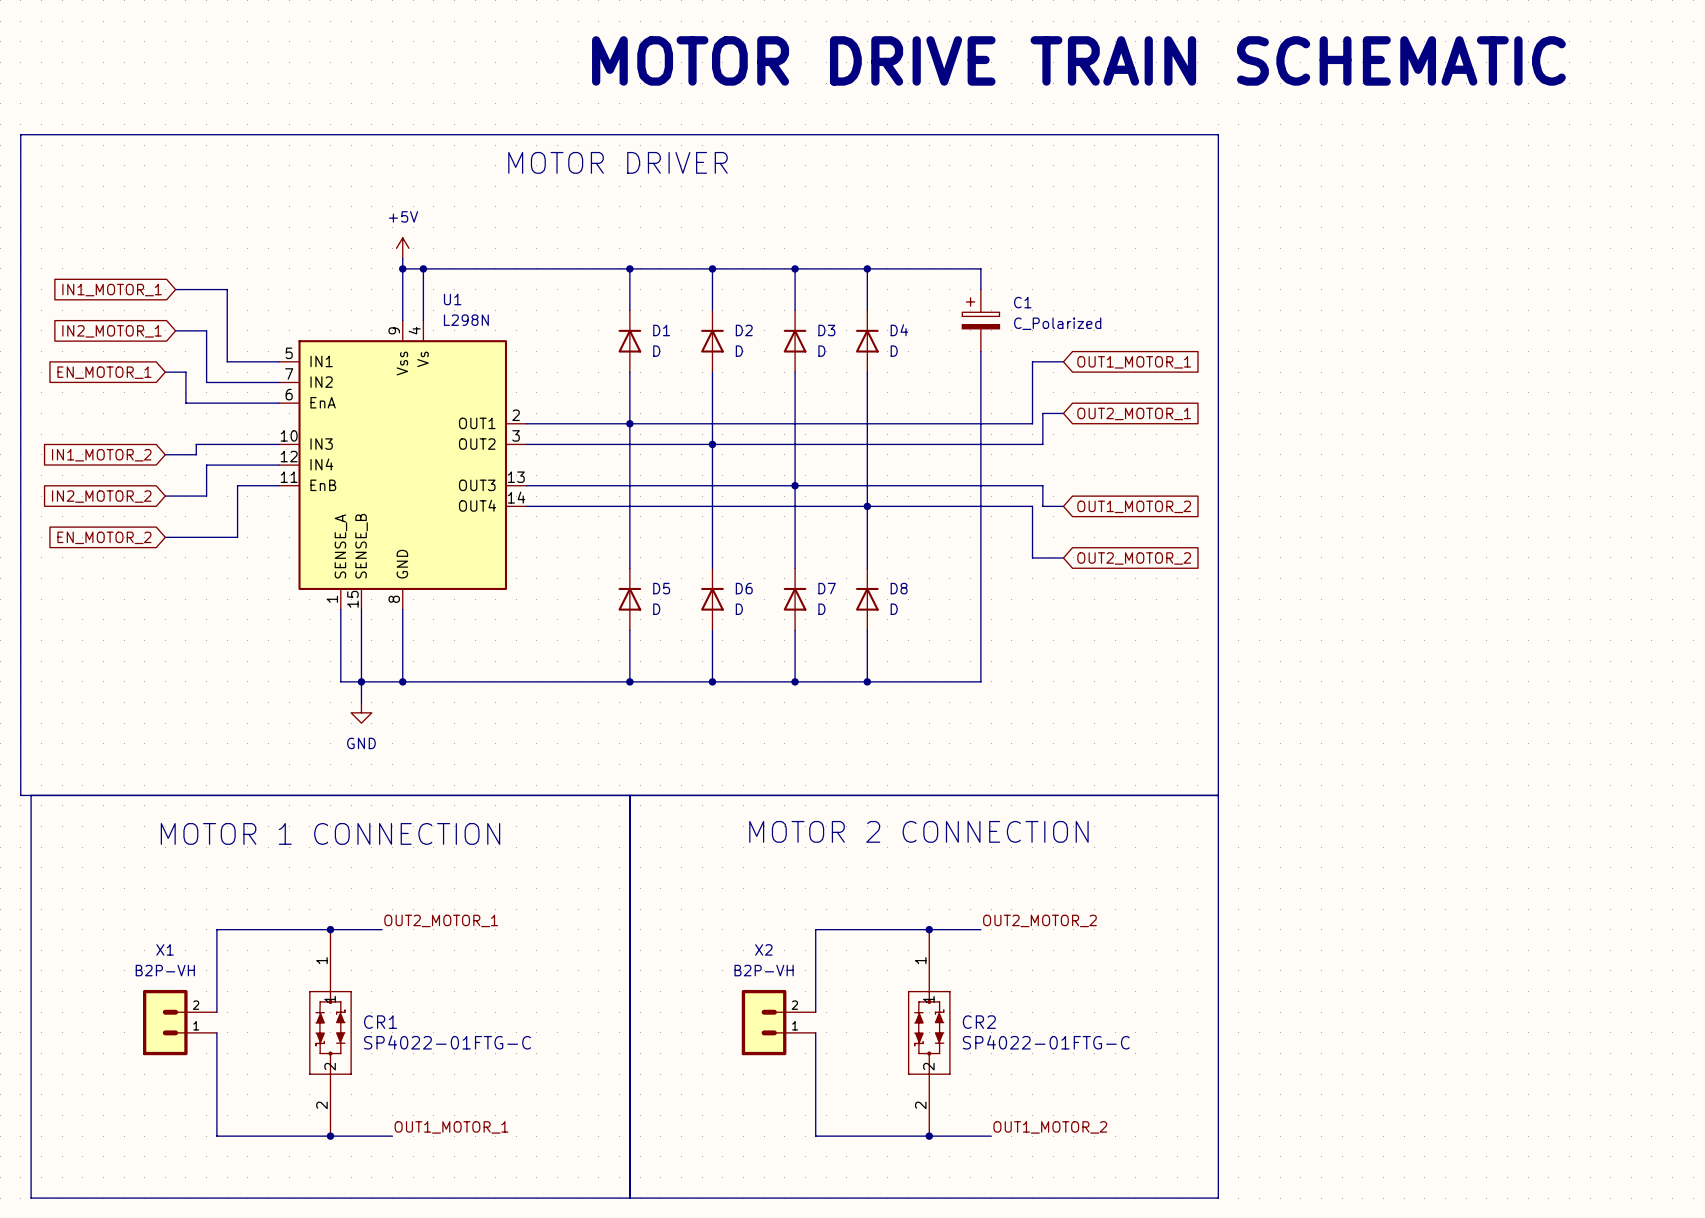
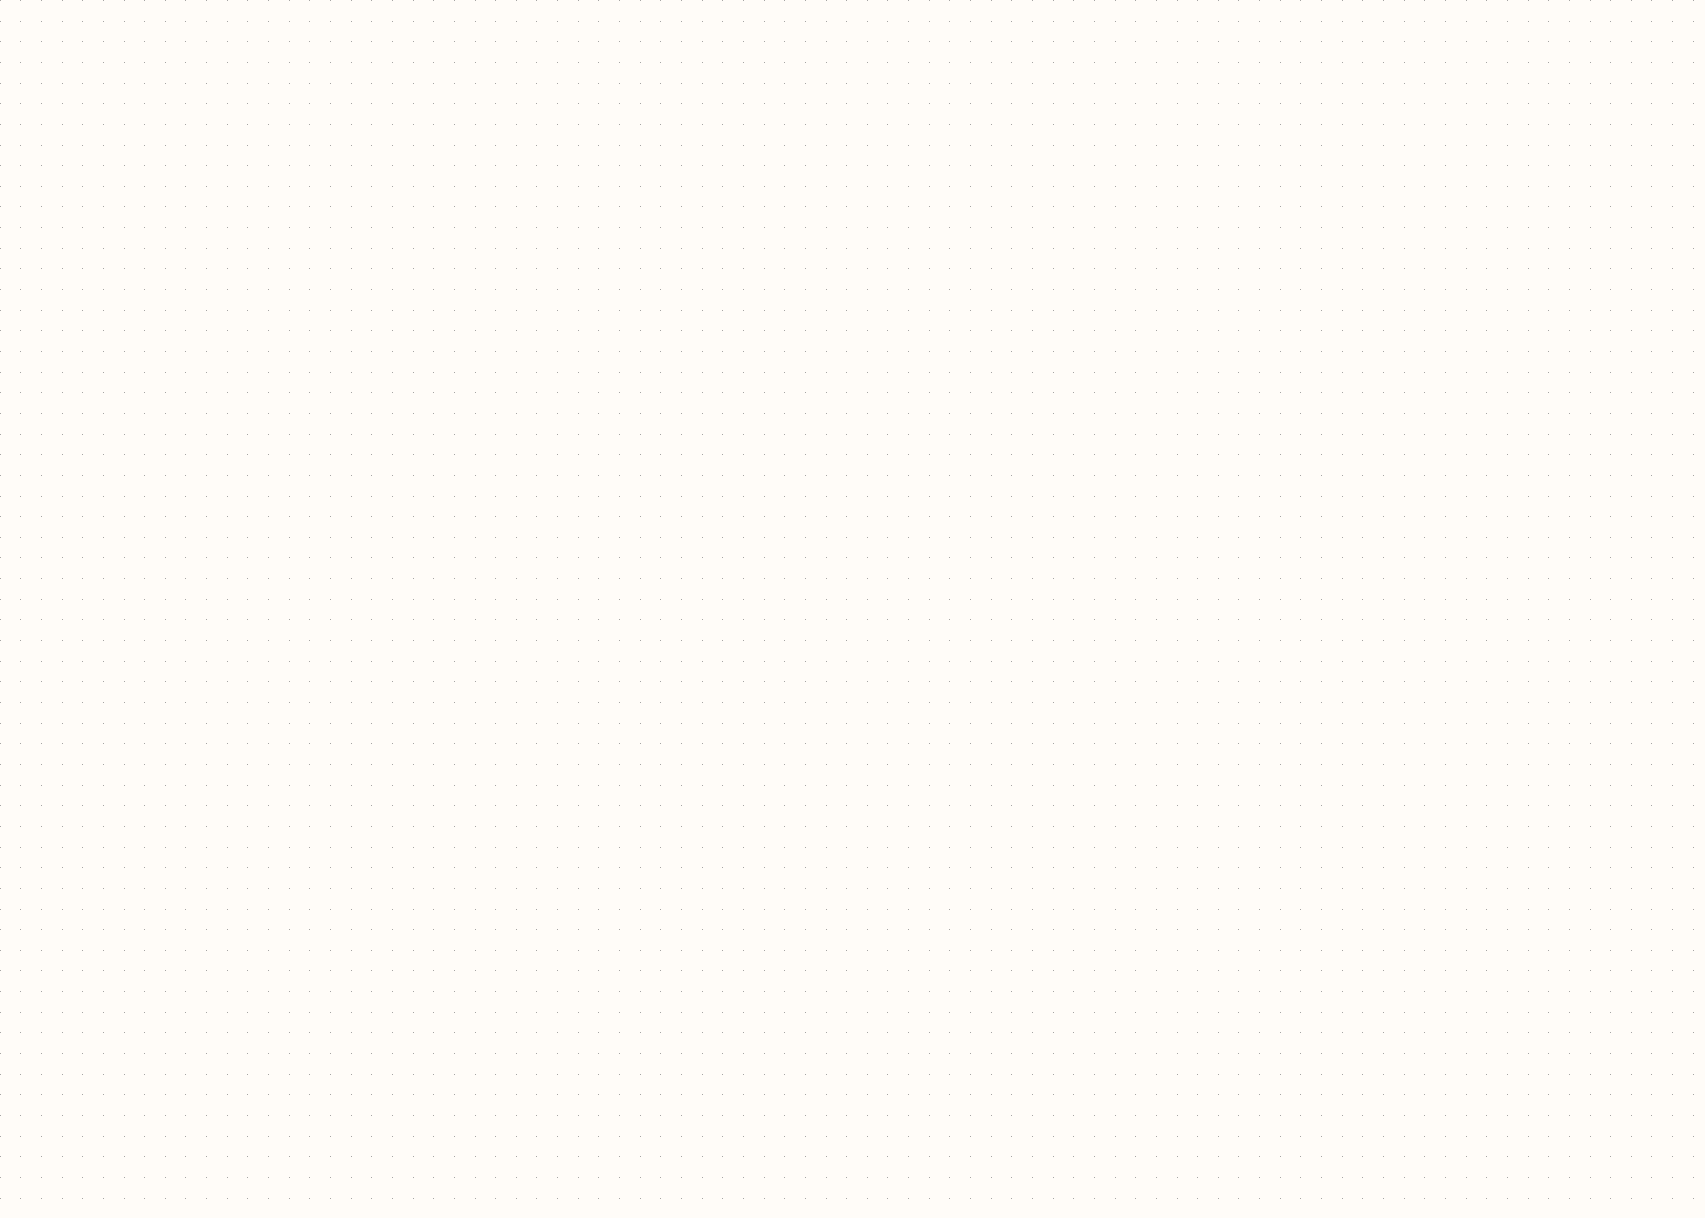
text: MOTOR DRIVE TRAIN SCHEMATIC (1078, 60) -> none
text: MOTOR DRIVER (617, 162) -> none
power symbol: +5V (402, 248) -> none
wire: (402, 258) (402, 320) -> none
wire: (402, 268) (980, 268) (980, 289) -> none
junction: (402, 268) -> none
wire: (423, 268) (423, 320) -> none
junction: (423, 268) -> none
wire: (629, 268) (629, 310) -> none
junction: (629, 268) -> none
wire: (712, 268) (712, 310) -> none
junction: (712, 268) -> none
wire: (795, 268) (795, 310) -> none
junction: (795, 268) -> none
wire: (867, 268) (867, 310) -> none
junction: (867, 268) -> none
wire: (175, 289) (227, 289) (227, 361) (278, 361) -> none
global label: IN1_MOTOR_1 (112, 290) -> none
C1: C_Polarized (980, 320) -> none
wire: (175, 330) (206, 330) (206, 382) (278, 382) -> none
global label: IN2_MOTOR_1 (112, 331) -> none
D1: D (629, 341) -> none
D2: D (712, 341) -> none
D3: D (795, 341) -> none
D4: D (867, 341) -> none
wire: (980, 351) (980, 681) (340, 681) (340, 609) -> none
wire: (1063, 361) (1032, 361) (1032, 423) (526, 423) -> none
global label: OUT1_MOTOR_1 (1134, 362) -> none
global label: EN_MOTOR_1 (104, 372) -> none
wire: (165, 372) (185, 372) (185, 403) (278, 403) -> none
wire: (629, 372) (629, 568) -> none
wire: (712, 372) (712, 568) -> none
wire: (795, 372) (795, 568) -> none
wire: (867, 372) (867, 568) -> none
wire: (1063, 413) (1042, 413) (1042, 444) (526, 444) -> none
global label: OUT2_MOTOR_1 (1134, 413) -> none
junction: (629, 423) -> none
wire: (278, 444) (196, 444) (196, 454) (165, 454) -> none
junction: (712, 444) -> none
global label: IN1_MOTOR_2 (101, 455) -> none
wire: (278, 465) (206, 465) (206, 496) (165, 496) -> none
U1: L298N (402, 465) -> none
wire: (278, 485) (237, 485) (237, 537) (165, 537) -> none
wire: (526, 485) (1042, 485) (1042, 506) (1063, 506) -> none
junction: (795, 485) -> none
global label: IN2_MOTOR_2 (101, 496) -> none
wire: (526, 506) (1032, 506) (1032, 557) (1063, 557) -> none
junction: (867, 506) -> none
global label: OUT1_MOTOR_2 (1134, 506) -> none
global label: EN_MOTOR_2 (104, 537) -> none
global label: OUT2_MOTOR_2 (1134, 558) -> none
D5: D (629, 599) -> none
D6: D (712, 599) -> none
D7: D (795, 599) -> none
D8: D (867, 599) -> none
wire: (361, 609) (361, 702) -> none
wire: (402, 609) (402, 681) -> none
wire: (629, 630) (629, 681) -> none
wire: (712, 630) (712, 681) -> none
wire: (795, 630) (795, 681) -> none
wire: (867, 630) (867, 681) -> none
junction: (361, 681) -> none
junction: (402, 681) -> none
junction: (629, 681) -> none
junction: (712, 681) -> none
junction: (795, 681) -> none
junction: (867, 681) -> none
power symbol: GND (361, 712) -> none
line: (31, 795) (31, 1198) (1218, 1198) (1218, 134) (20, 134) (20, 795) (1218, 795) -> none
line: (629, 795) (629, 1198) -> none
text: MOTOR 2 CONNECTION (918, 831) -> none
text: MOTOR 1 CONNECTION (330, 833) -> none
label: OUT2_MOTOR_1 (441, 920) -> none
label: OUT2_MOTOR_2 (1039, 920) -> none
junction: (330, 929) -> none
wire: (382, 929) (216, 929) (216, 1012) -> none
junction: (929, 929) -> none
wire: (980, 929) (815, 929) (815, 1012) -> none
X1: B2P-VH (179, 1022) -> none
X2: B2P-VH (778, 1022) -> none
wire: (216, 1032) (216, 1136) (392, 1136) -> none
CR1: SP4022-01FTG-C (330, 1032) -> none
wire: (815, 1032) (815, 1136) (991, 1136) -> none
CR2: SP4022-01FTG-C (929, 1032) -> none
label: OUT1_MOTOR_1 (451, 1127) -> none
label: OUT1_MOTOR_2 (1050, 1127) -> none
junction: (330, 1136) -> none
junction: (929, 1136) -> none

